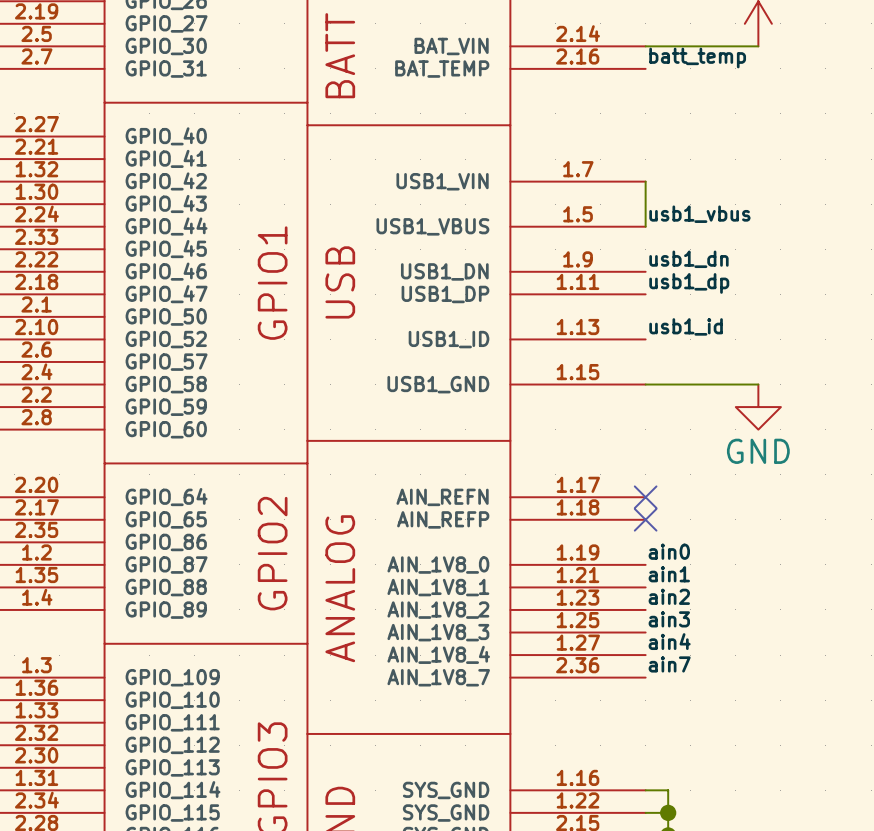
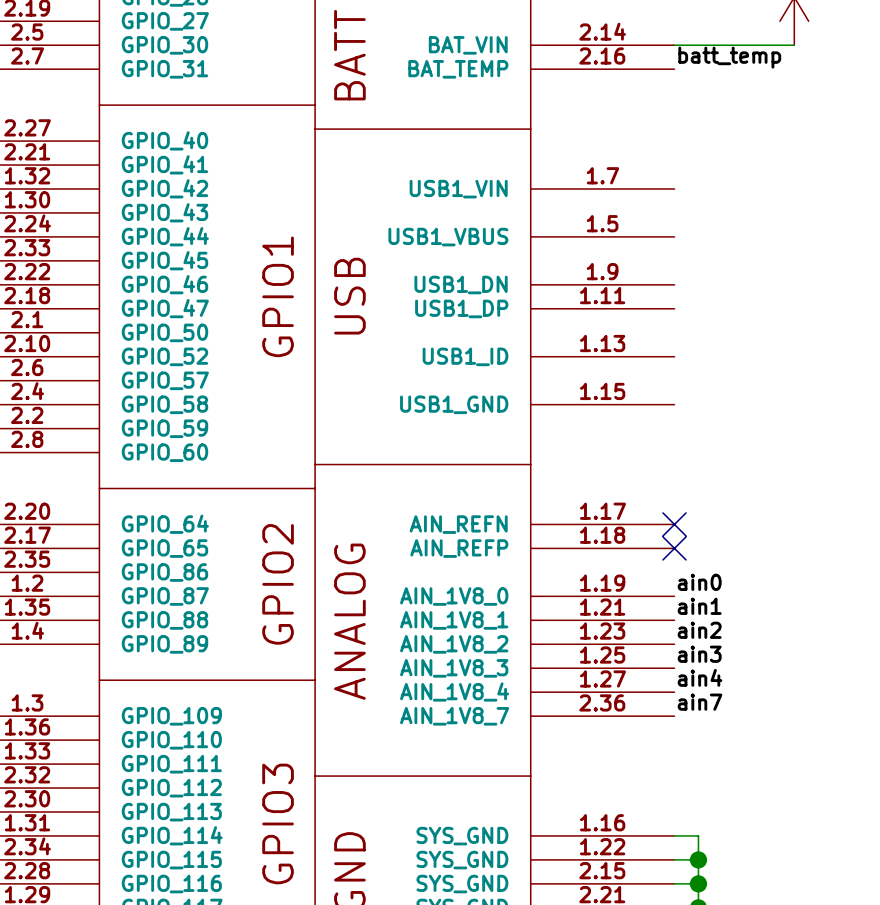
wire: (645, 181) (645, 226) -> none
label: usb1_vbus (699, 214) -> none
label: usb1_dn (688, 259) -> none
label: usb1_dp (689, 283) -> none
label: usb1_id (686, 326) -> none
wire: (645, 384) (758, 384) -> none
power symbol: GND (758, 407) -> none

